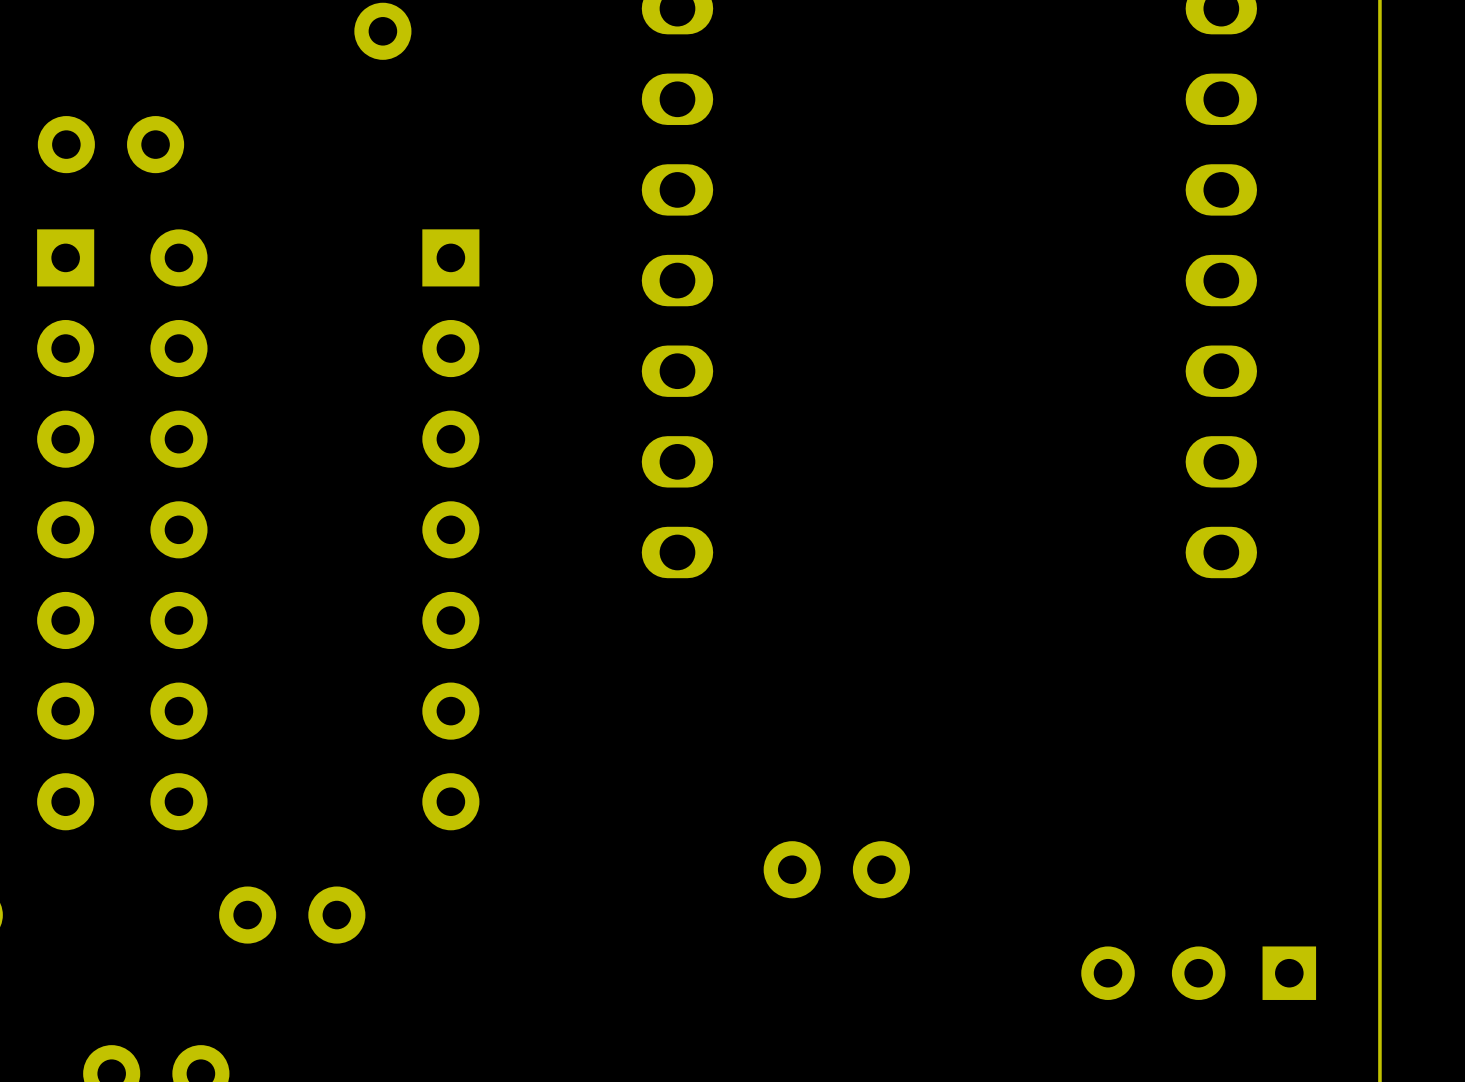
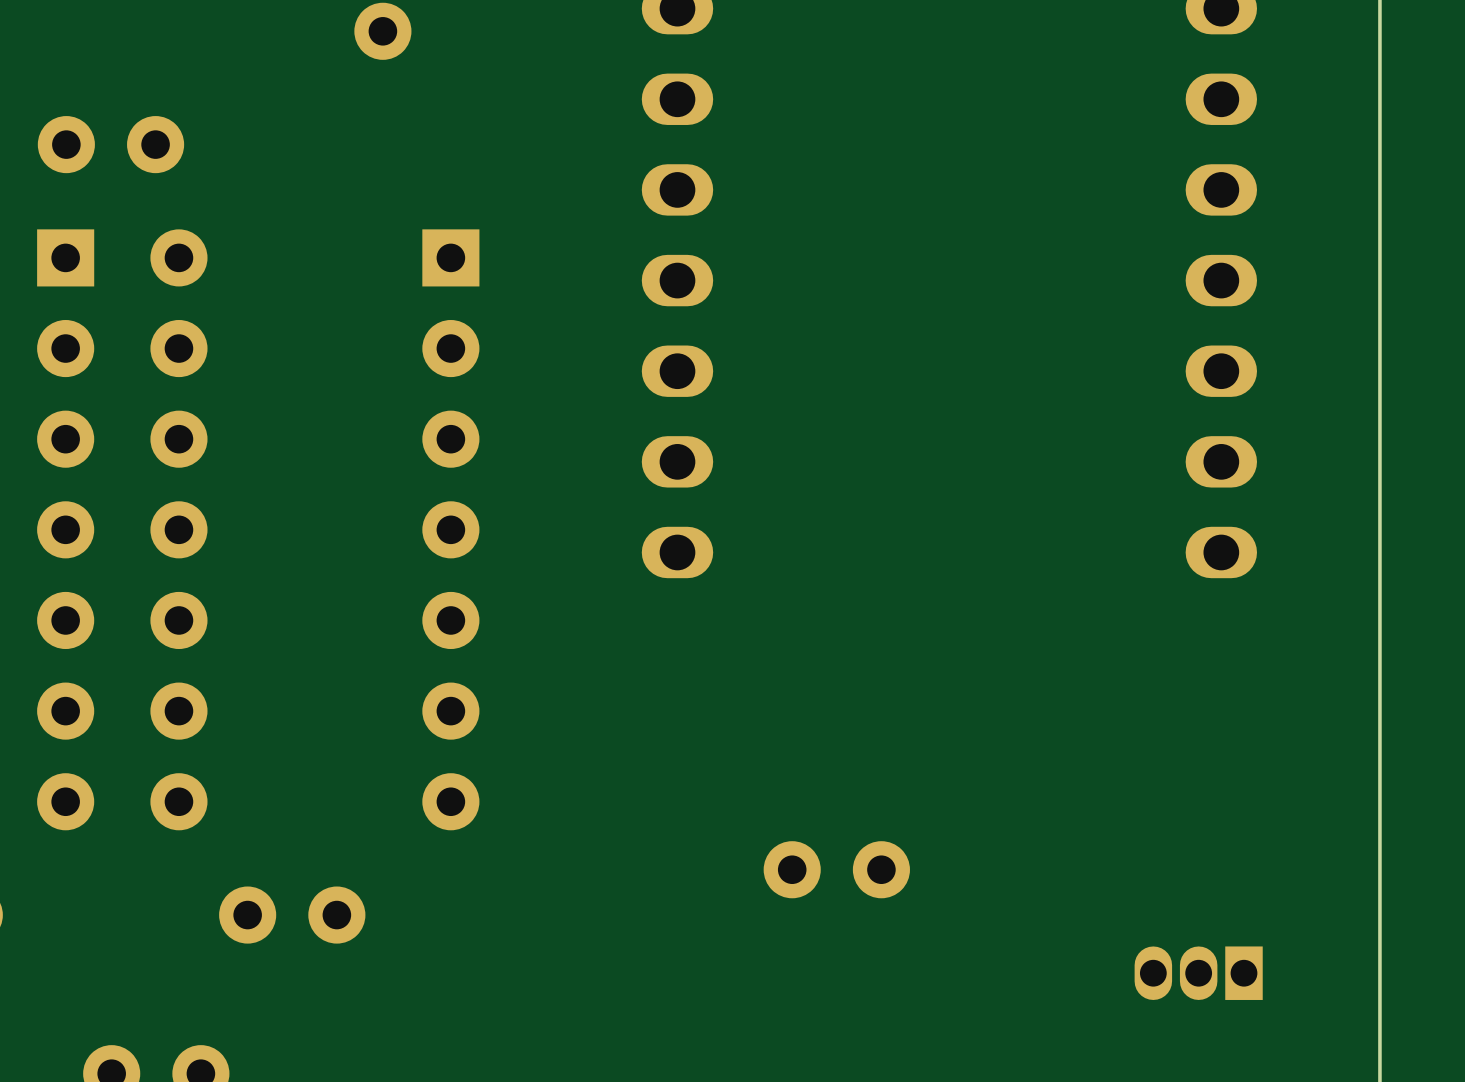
part footprint: [1081, 946, 1317, 1000] -> [1134, 946, 1263, 1000]

